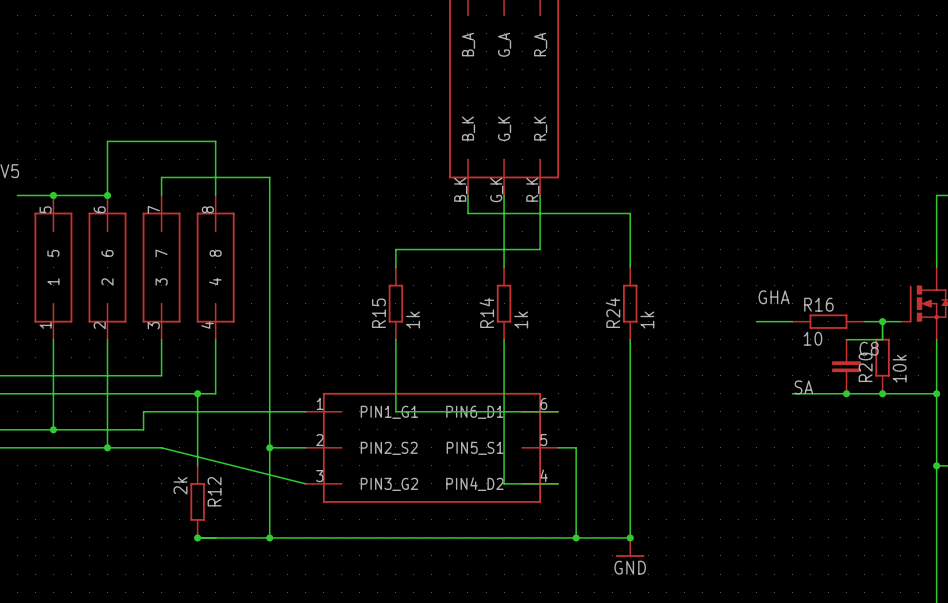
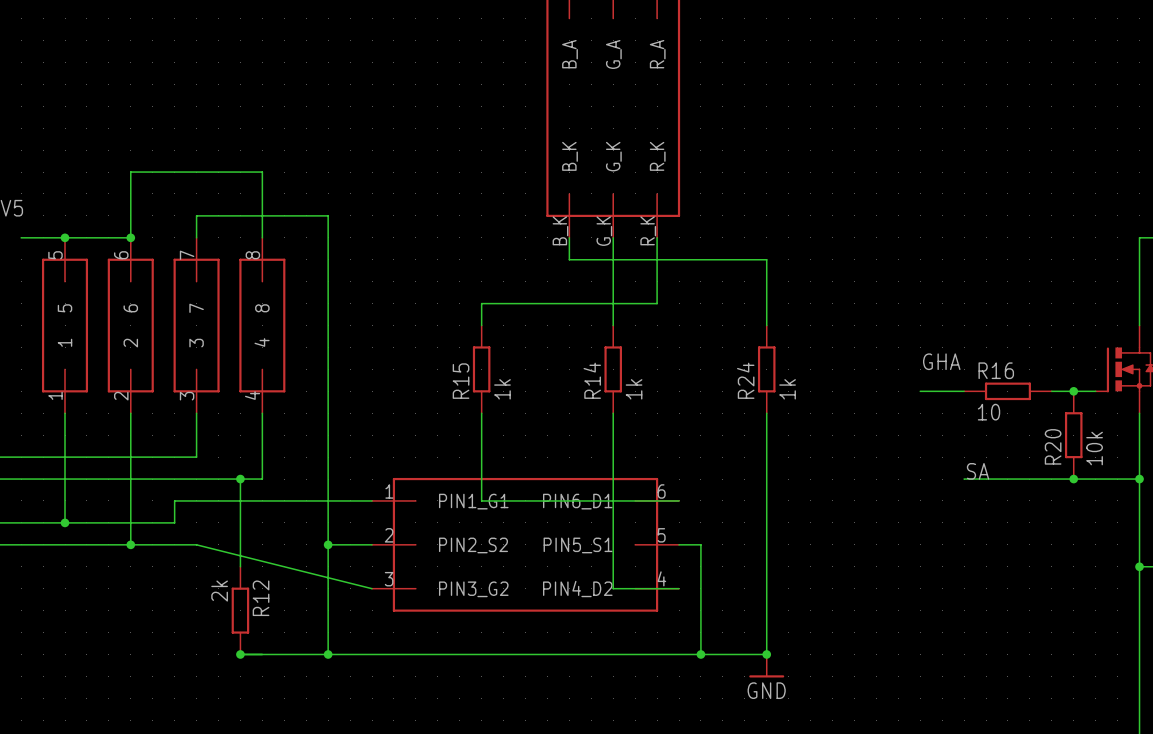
wire: (882, 321) (882, 339) (846, 339) -> none
C8: (846, 366) -> none
junction: (846, 393) -> none

